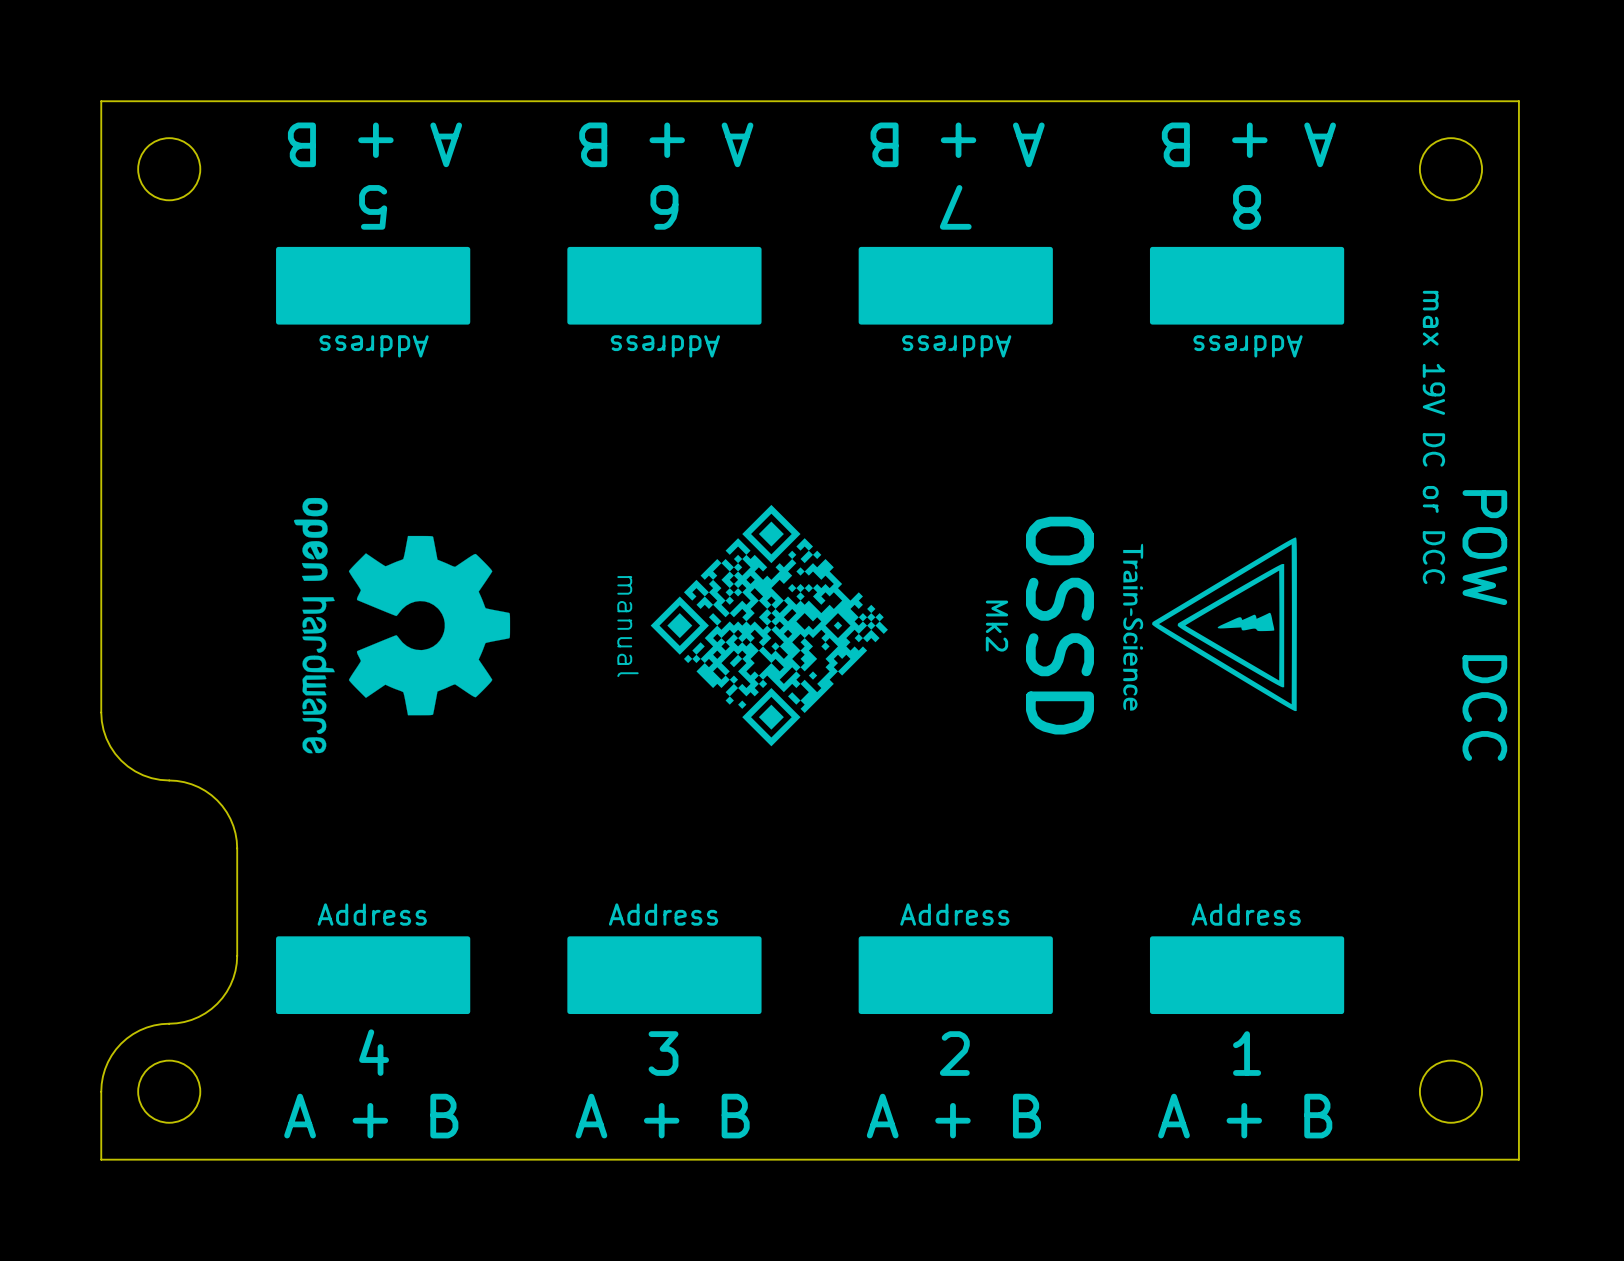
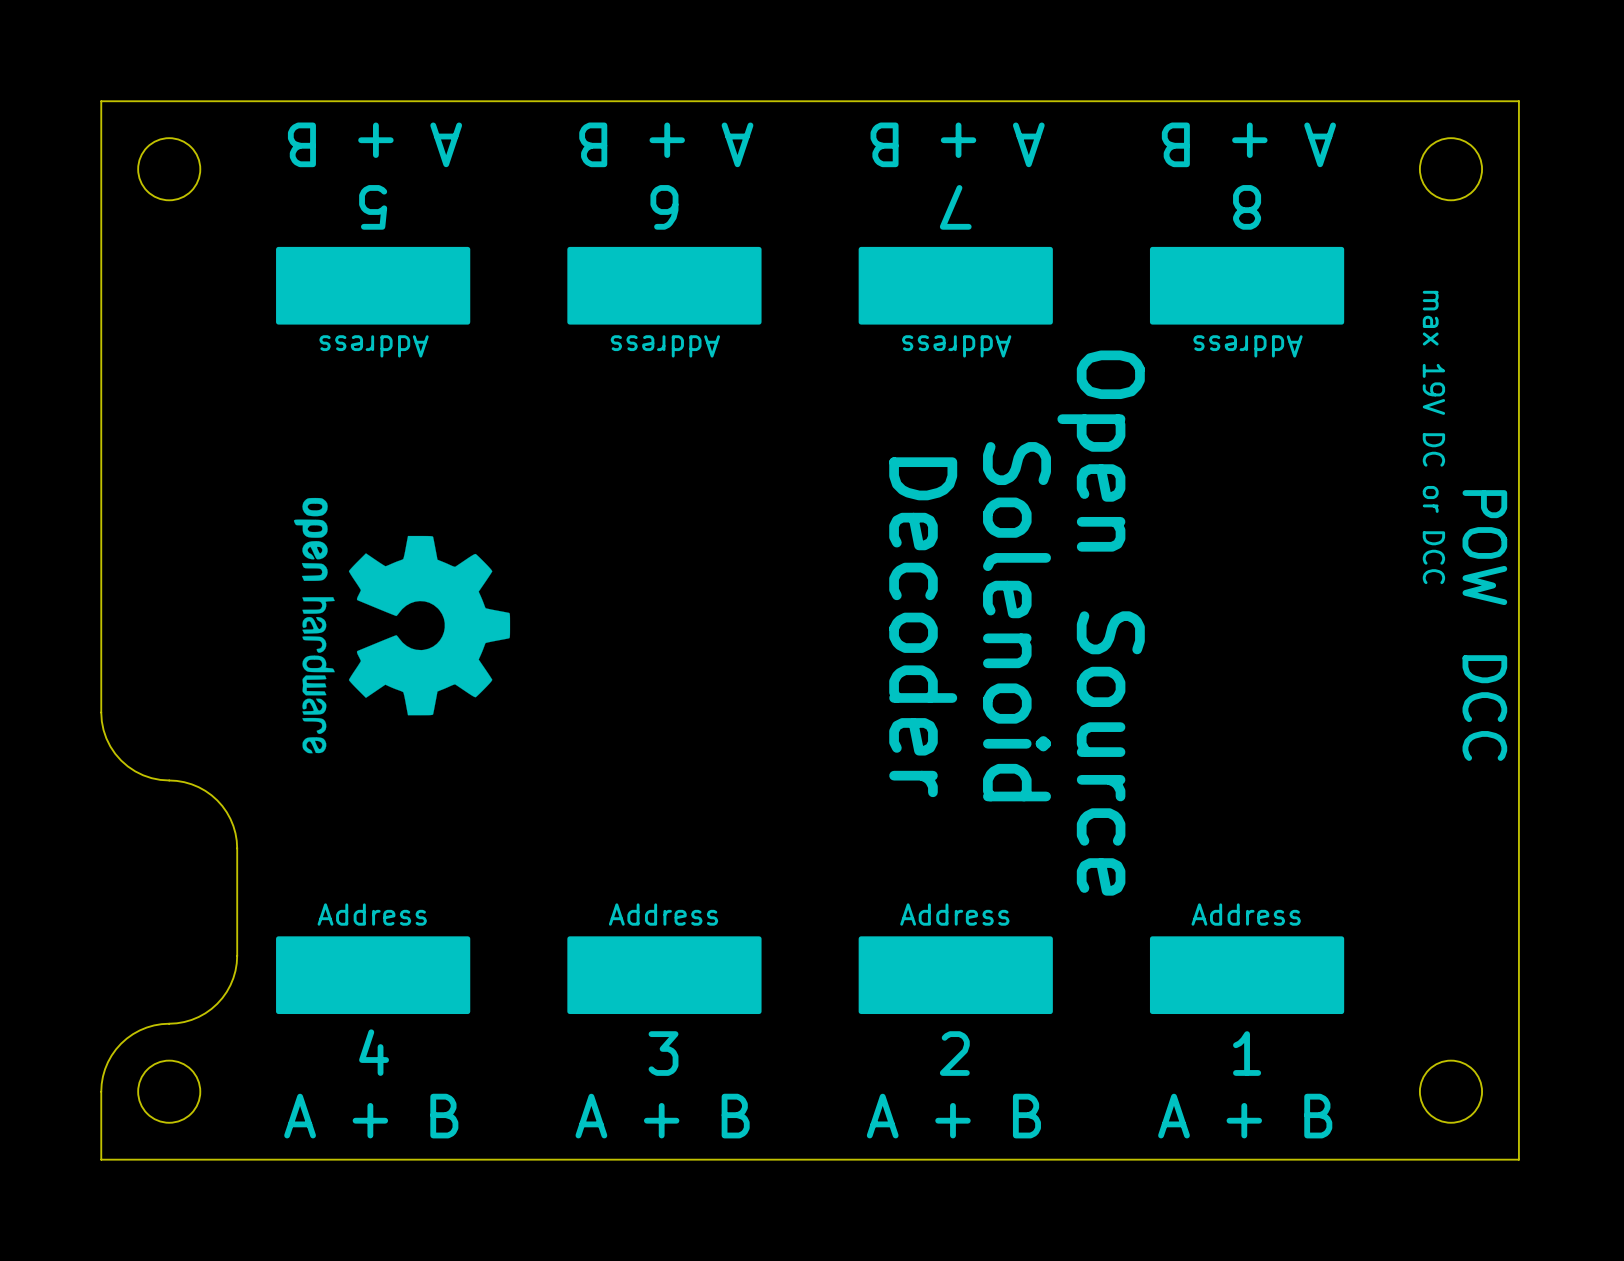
drawing: [650, 504, 888, 747] -> none
drawing: [1123, 537, 1297, 712] -> none
text: none -> Open Source (1101, 623)
text: OSSD (1059, 625) -> none
text: manual (627, 626) -> none
text: Mk2 (996, 626) -> Solenoid (1017, 621)
text: none -> Decoder (923, 627)

